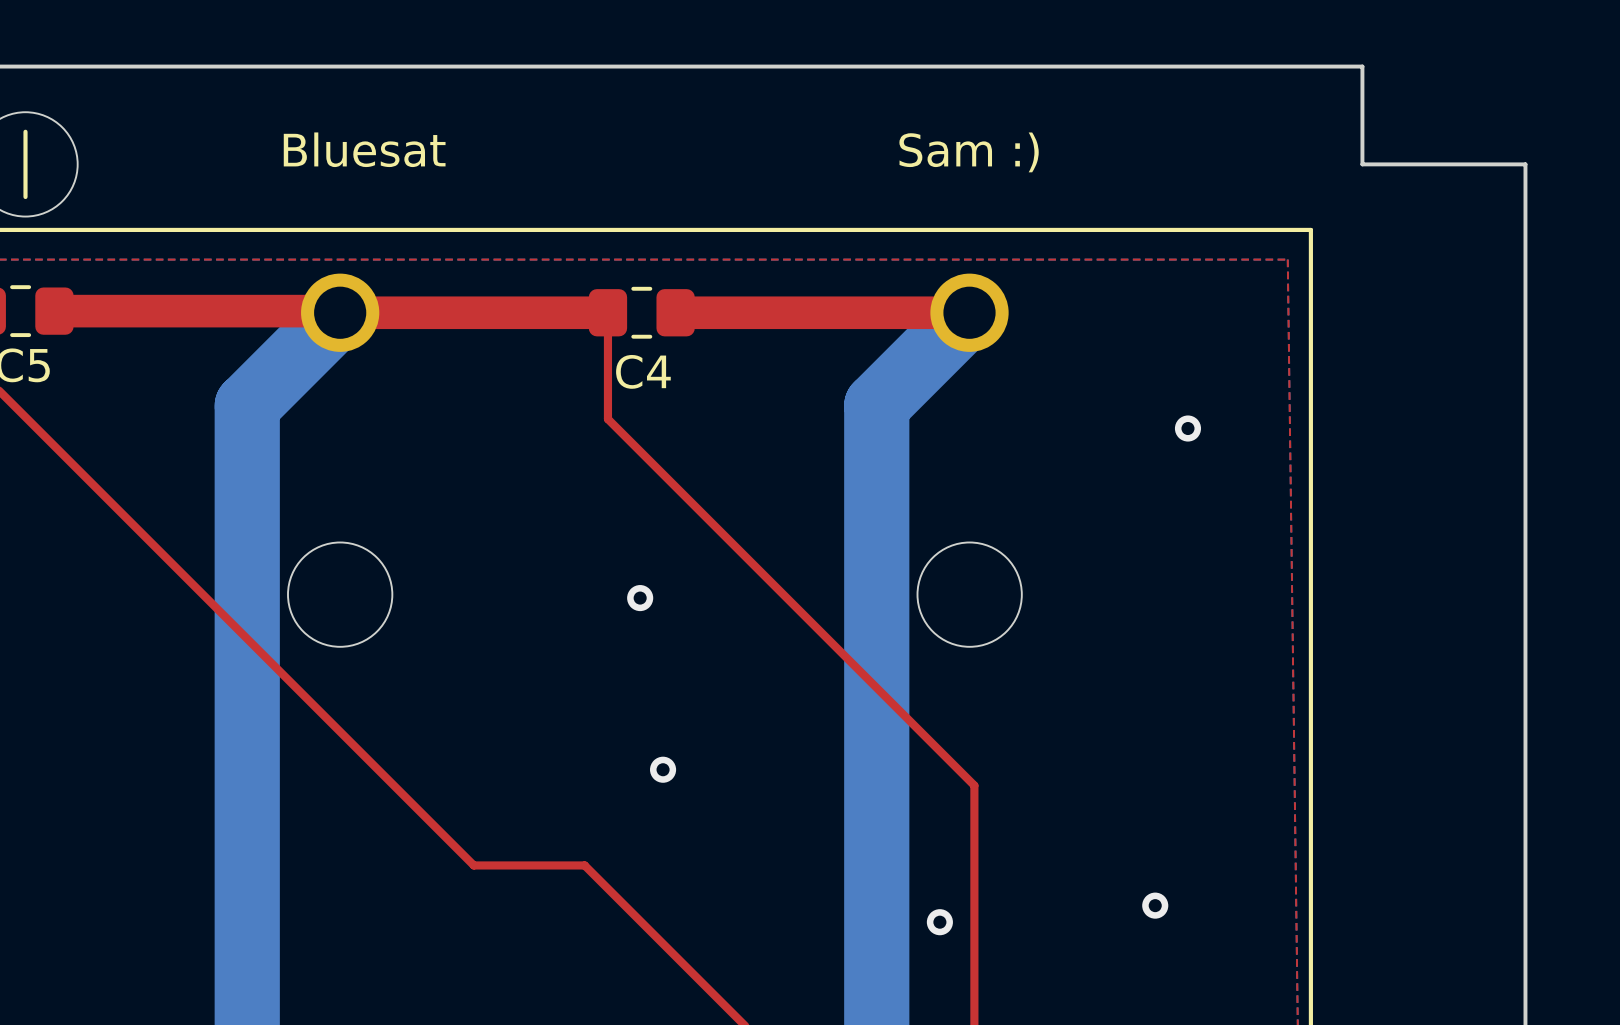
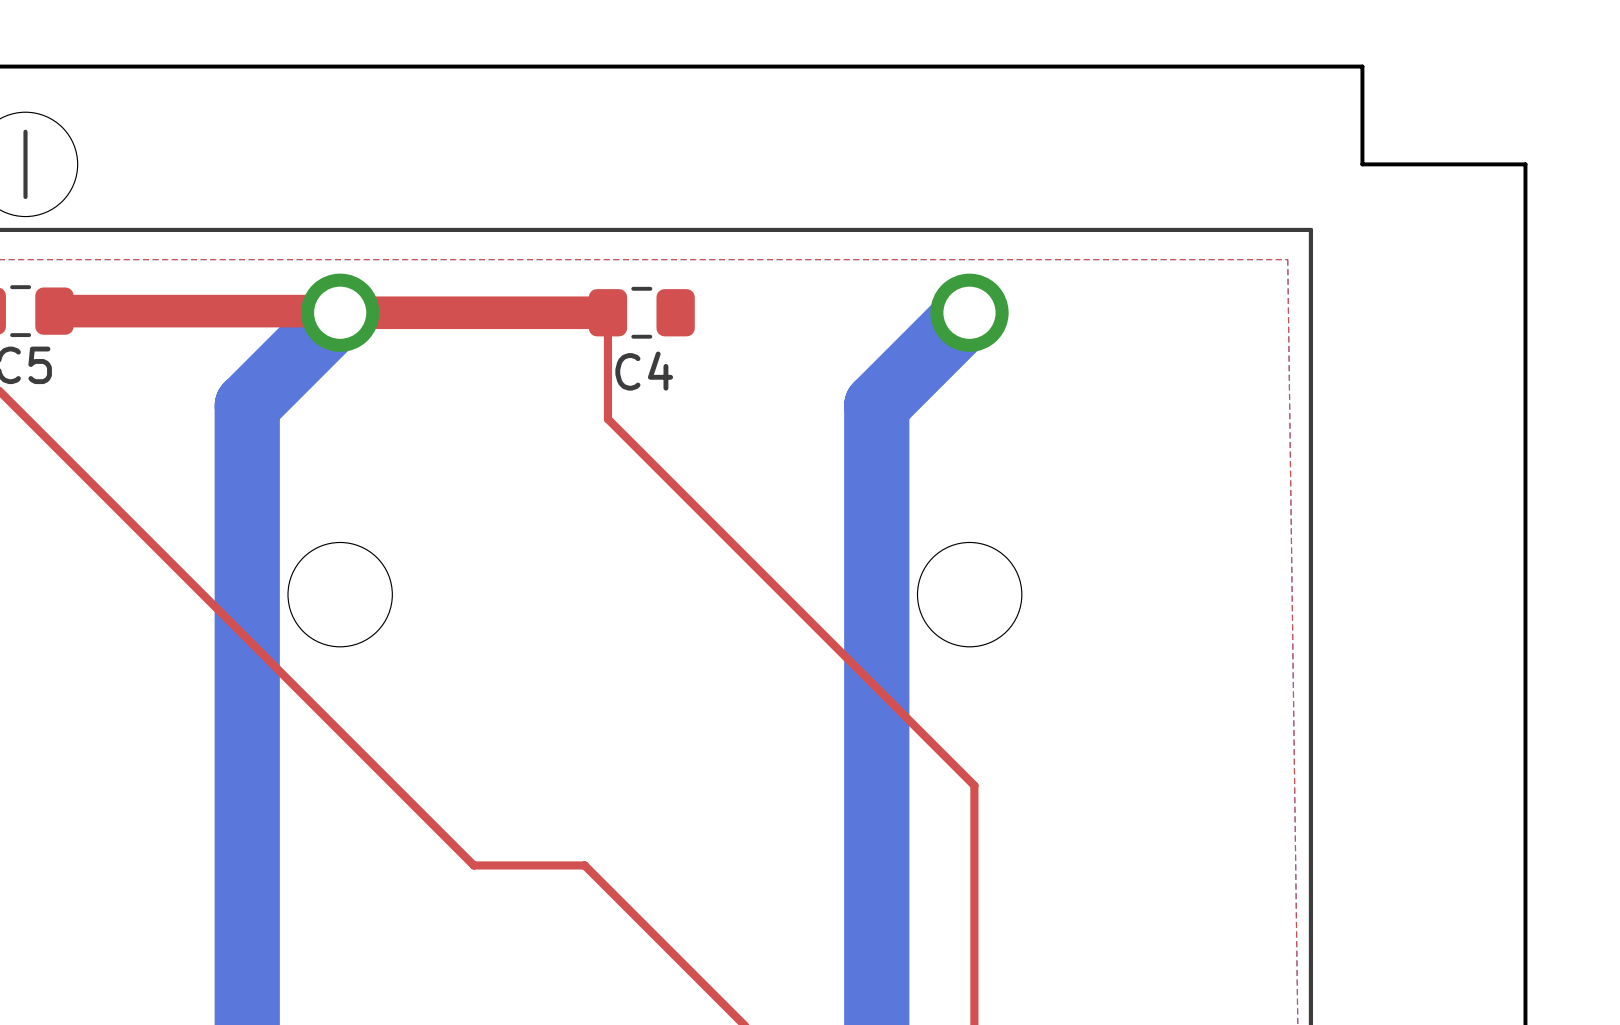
text: Bluesat (364, 149) -> none
text: Sam :) (969, 152) -> none
top track: (675, 312) (969, 312) -> none
via: (1187, 428) -> none
via: (640, 598) -> none
via: (663, 769) -> none
via: (1155, 905) -> none
via: (939, 922) -> none

